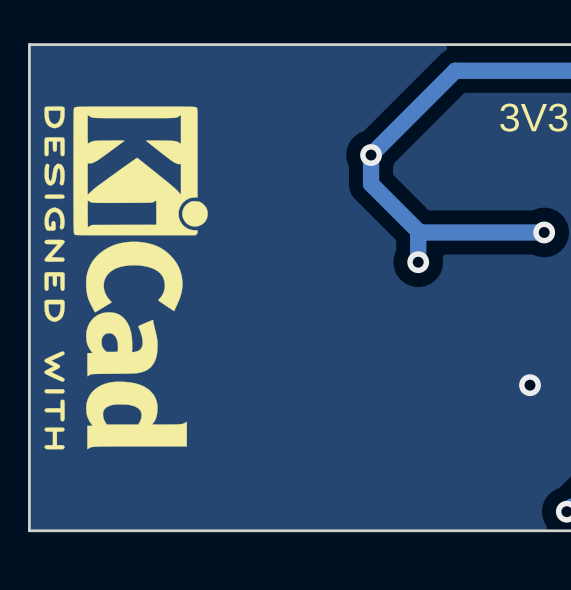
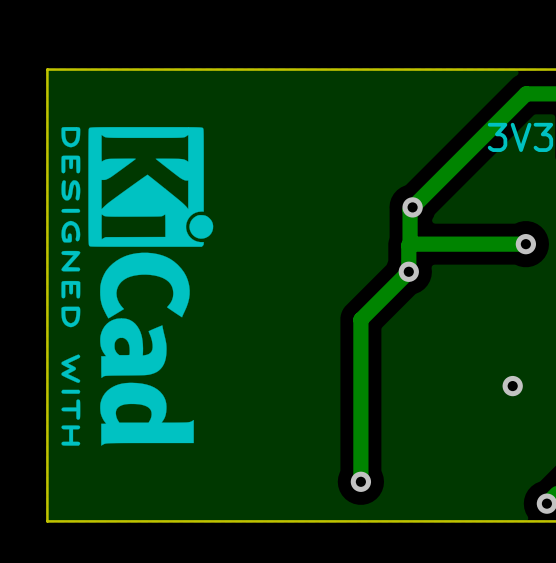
track: (544, 70) (455, 70) (371, 155) (371, 183) (419, 232) -> (526, 93) (410, 209) (410, 244)
via position: (371, 155) -> (412, 207)
track: none -> (408, 271) (360, 319) (360, 481)
via: none -> (360, 481)

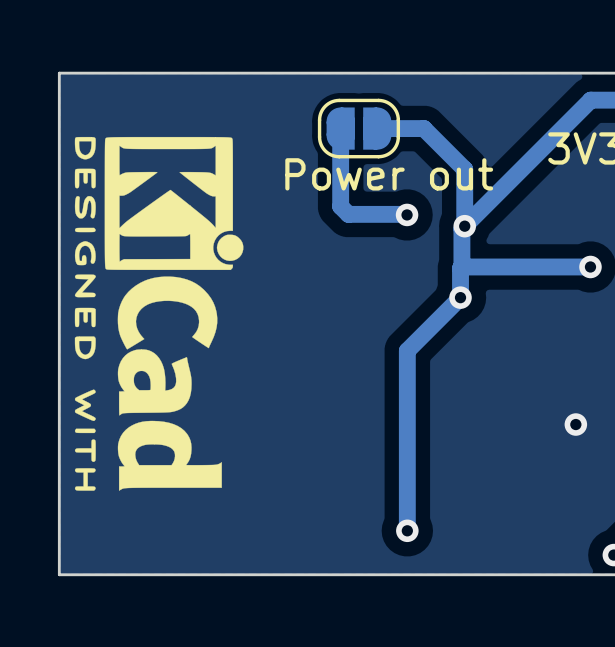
track: none -> (340, 128) (340, 206) (348, 214) (407, 214)
part: none -> (358, 128)
track: none -> (377, 128) (423, 128) (464, 169) (464, 226)
text: none -> Power out (389, 174)
via: none -> (407, 214)

